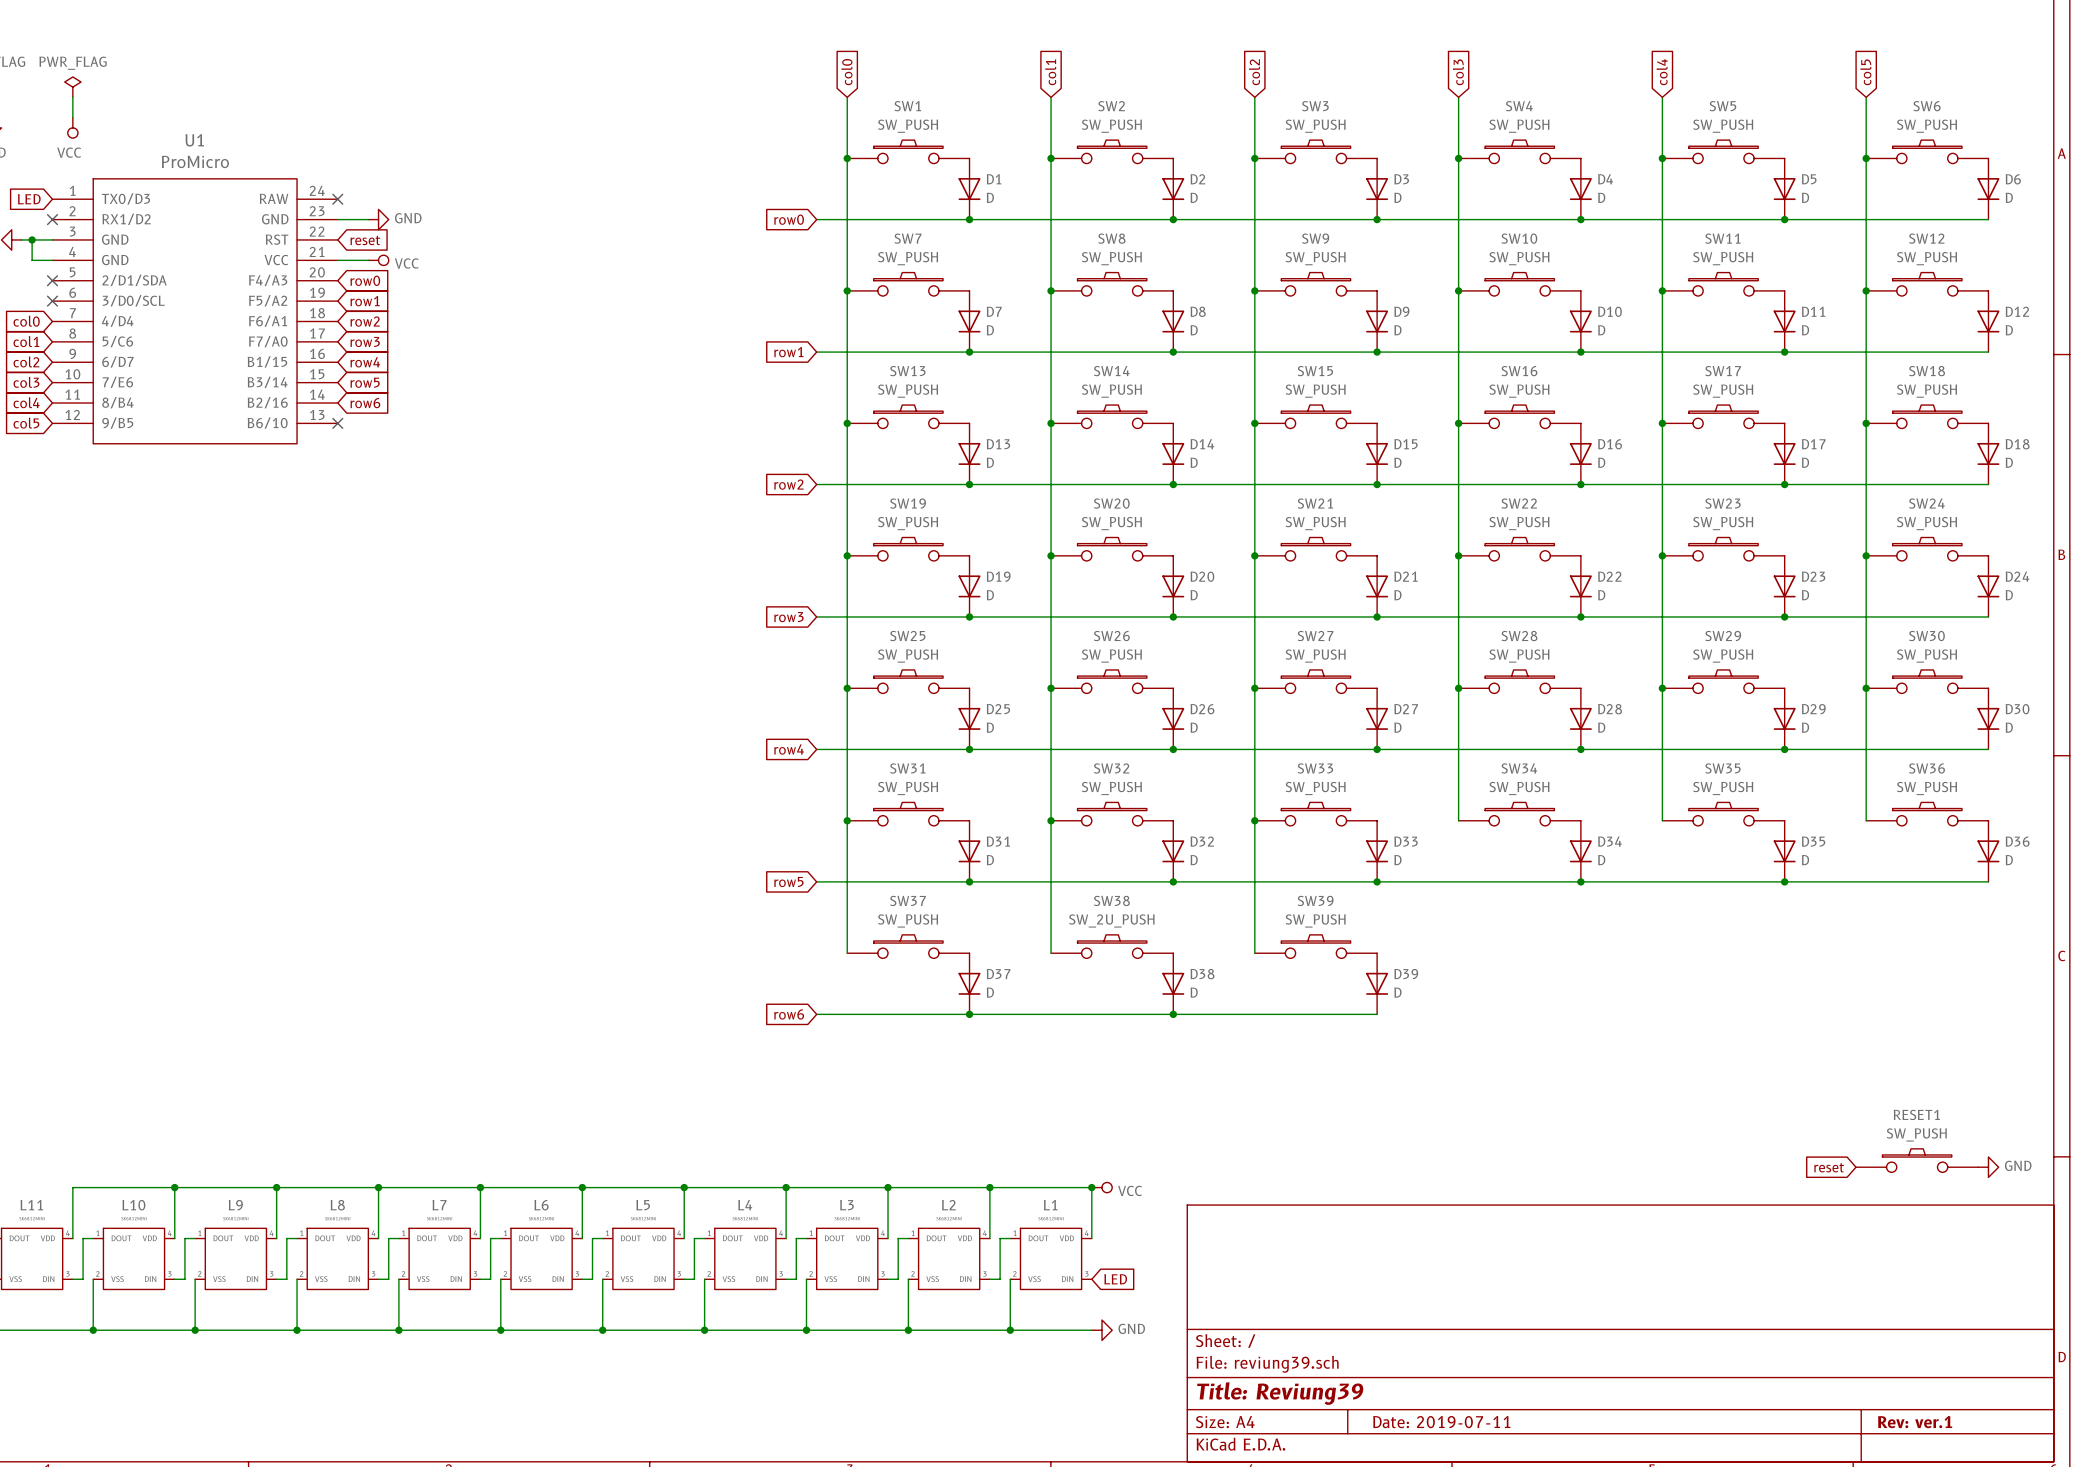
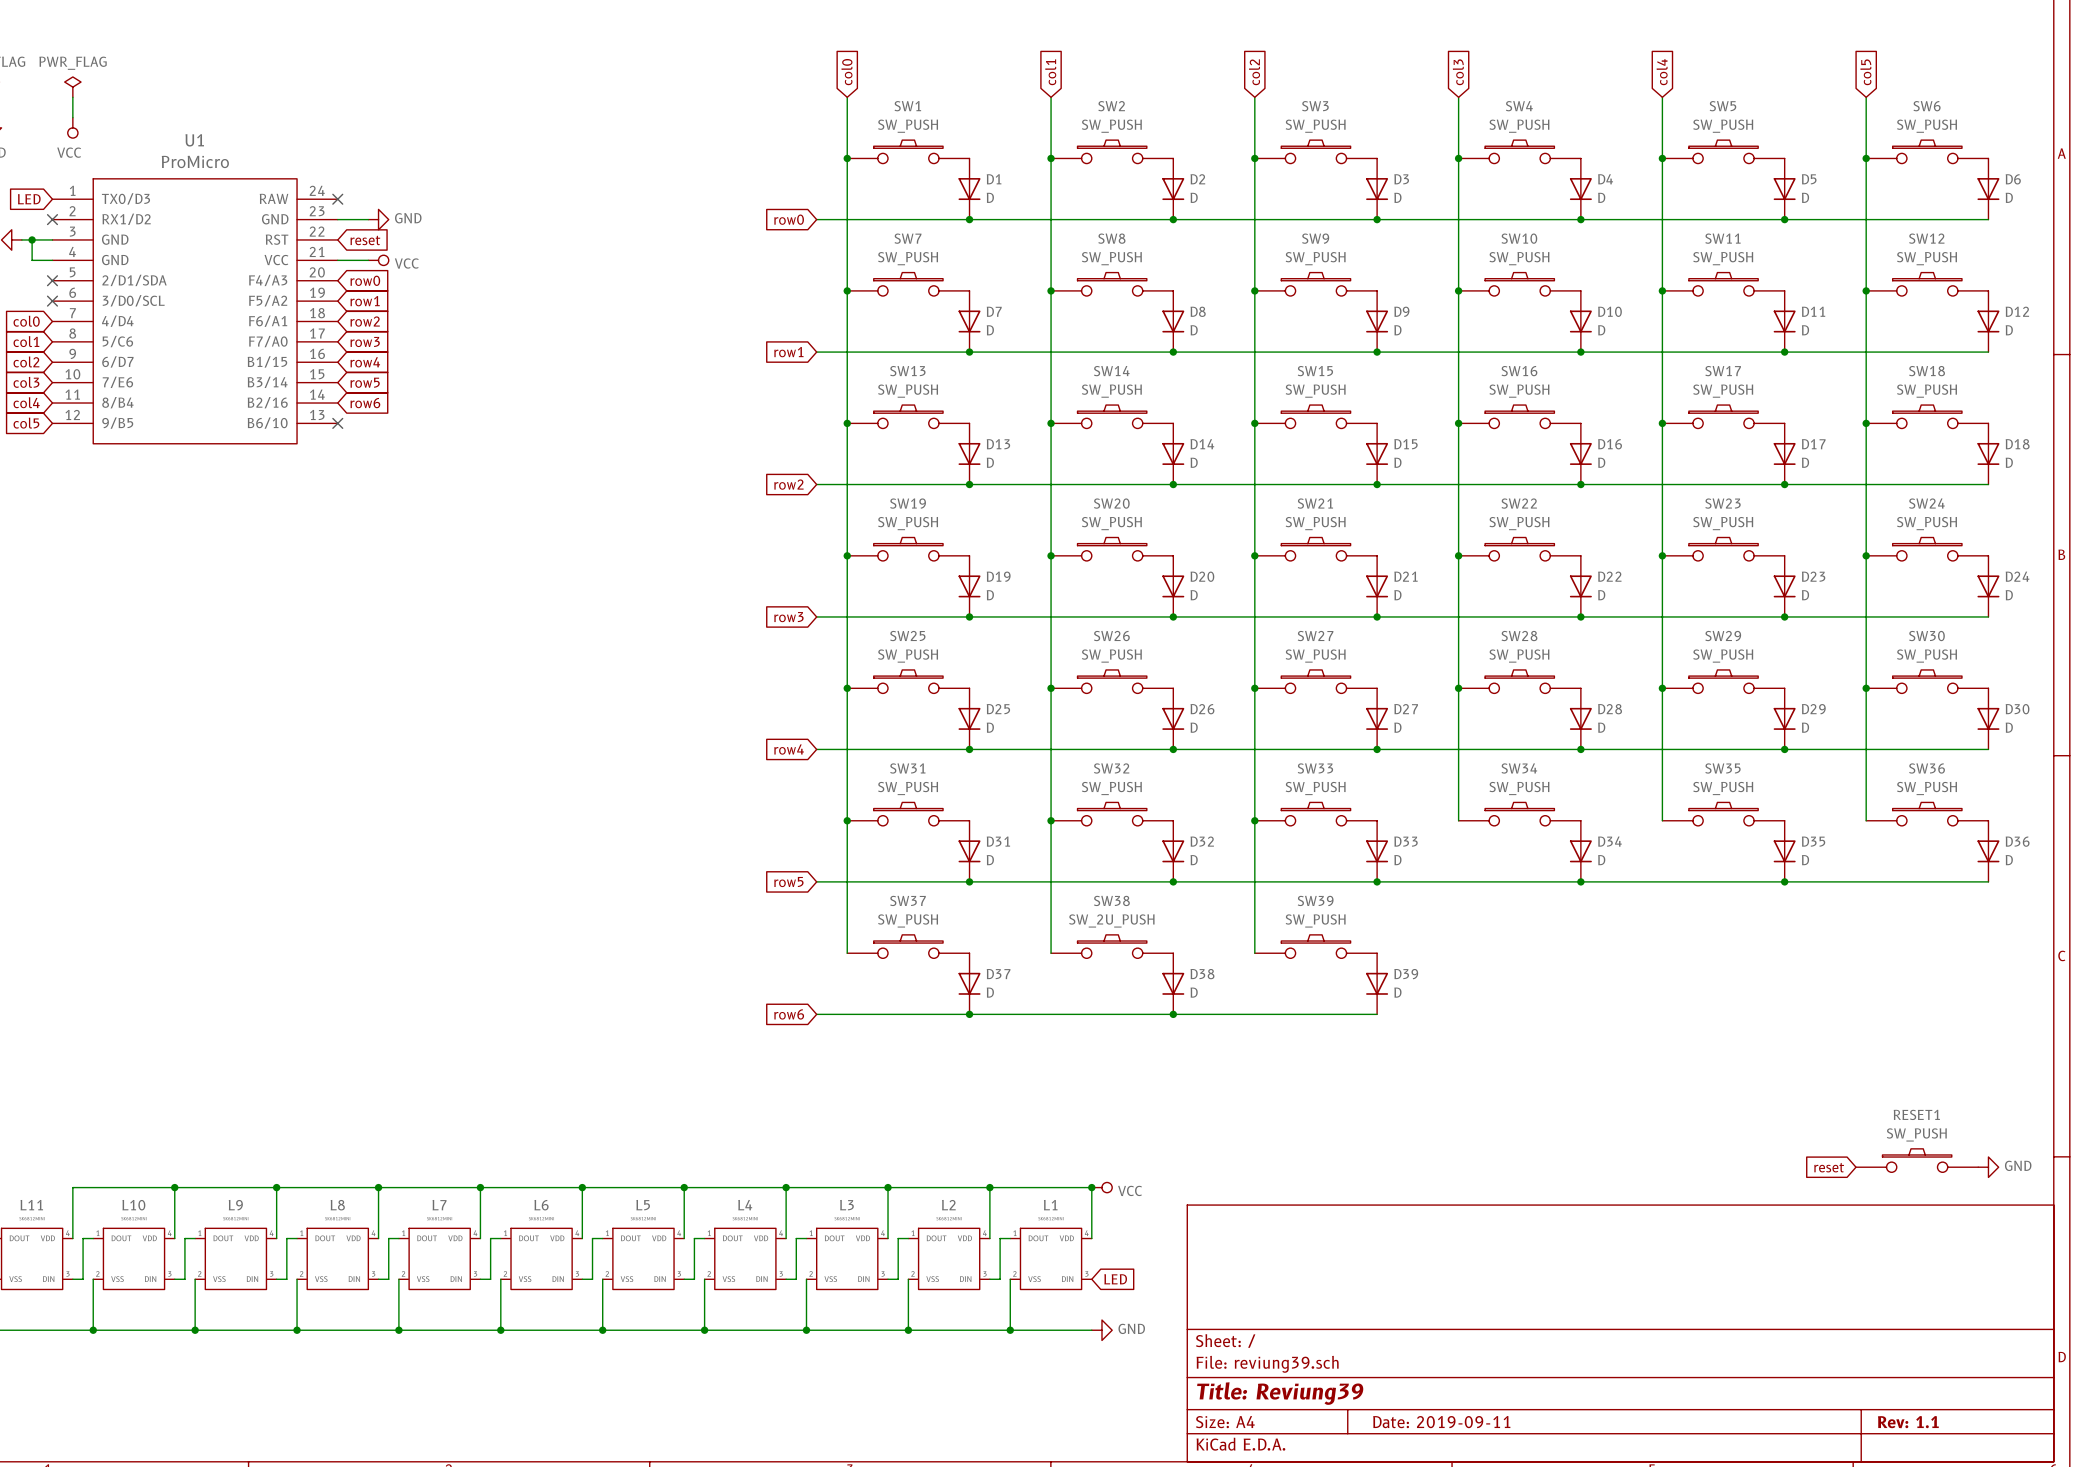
title block: Date: 2019-07-11 (1441, 1422) -> Date: 2019-09-11 (1441, 1422)
title block: Rev: ver.1 (1915, 1422) -> Rev: 1.1 (1908, 1422)

